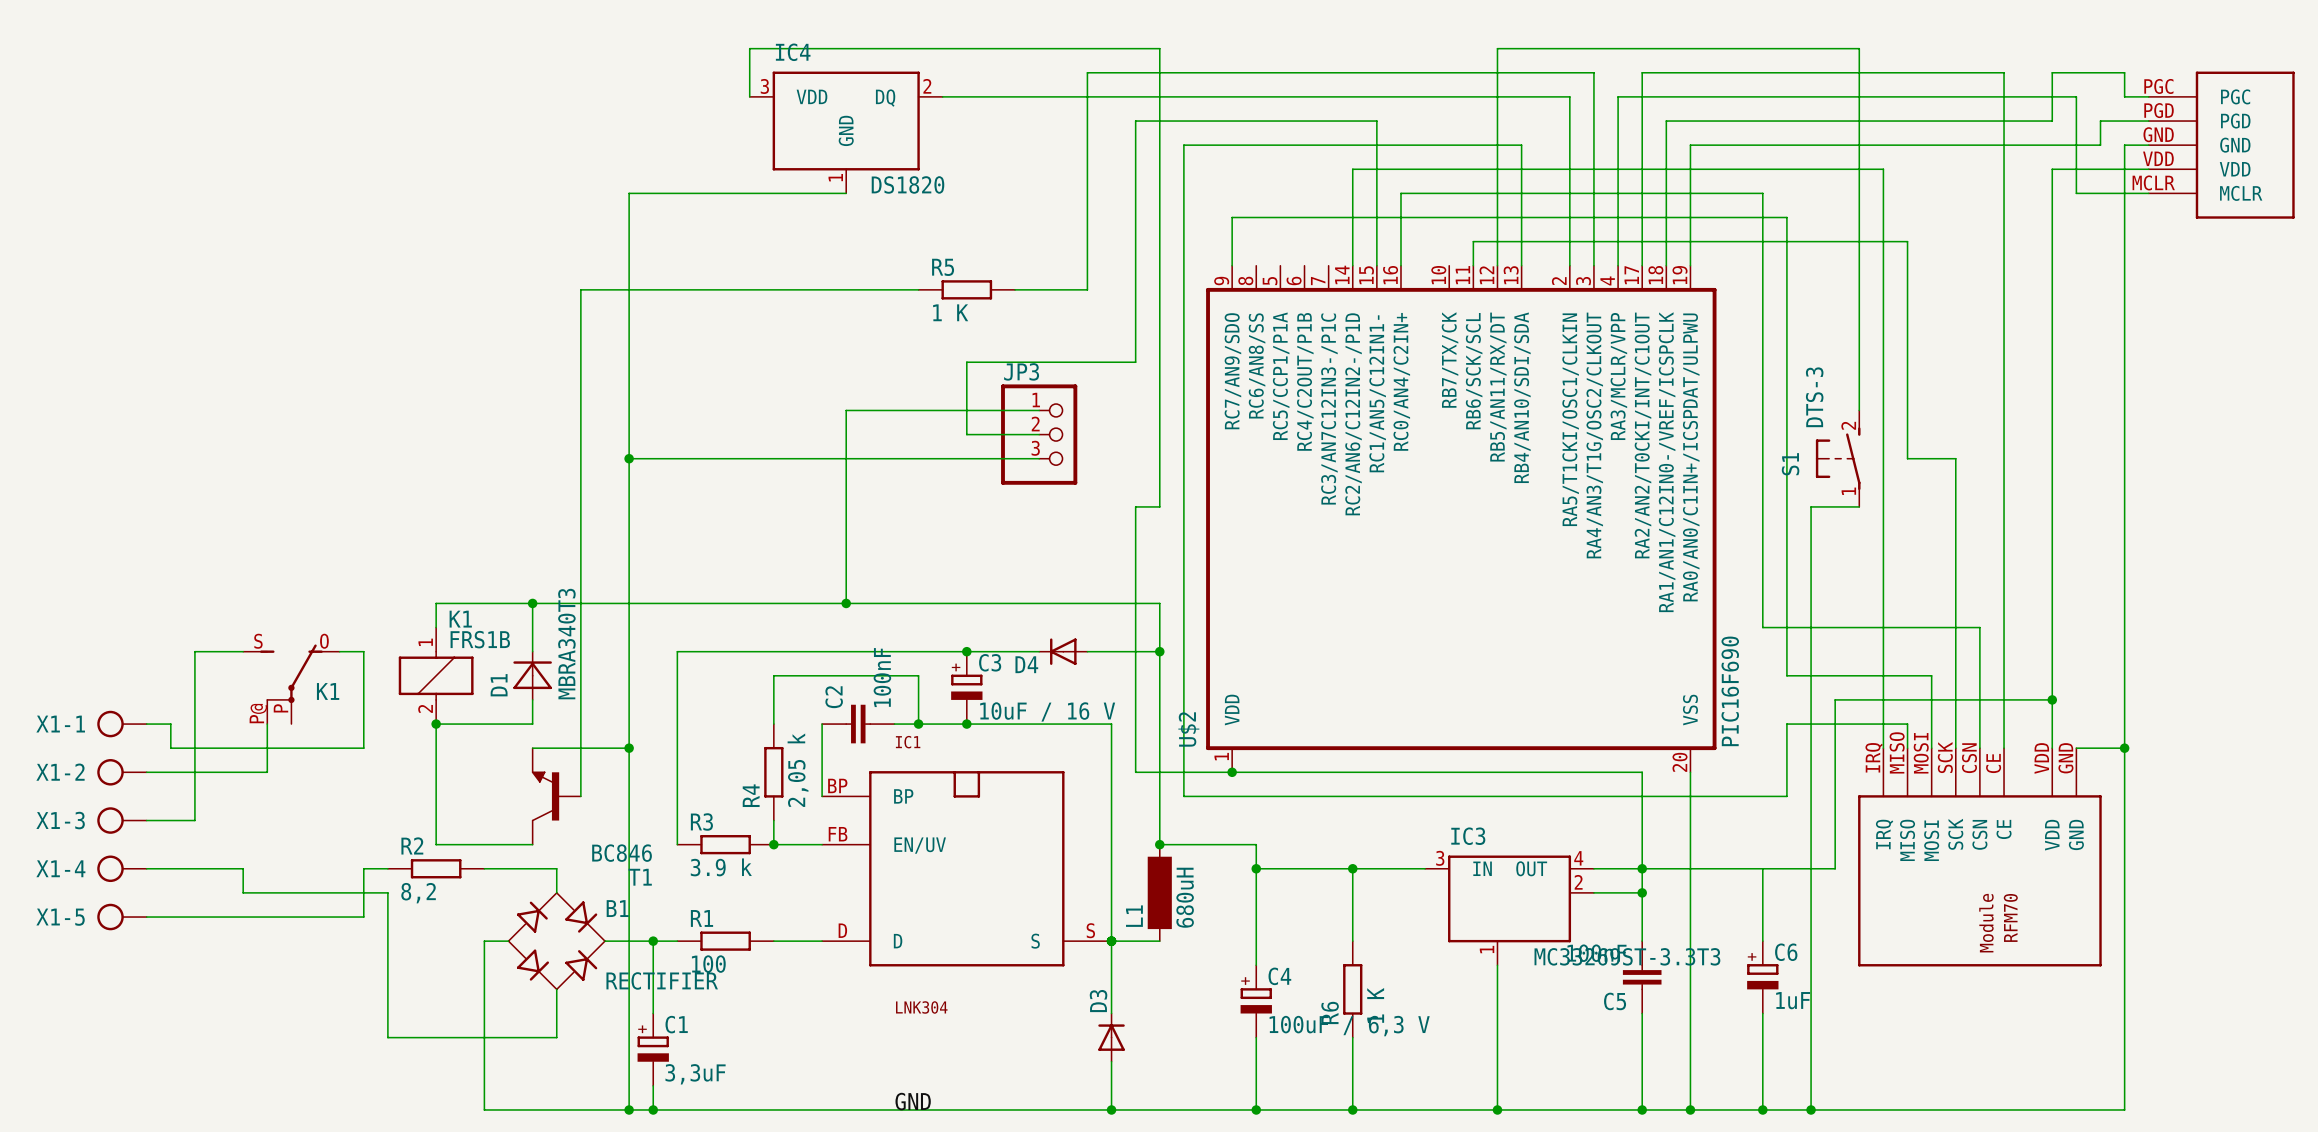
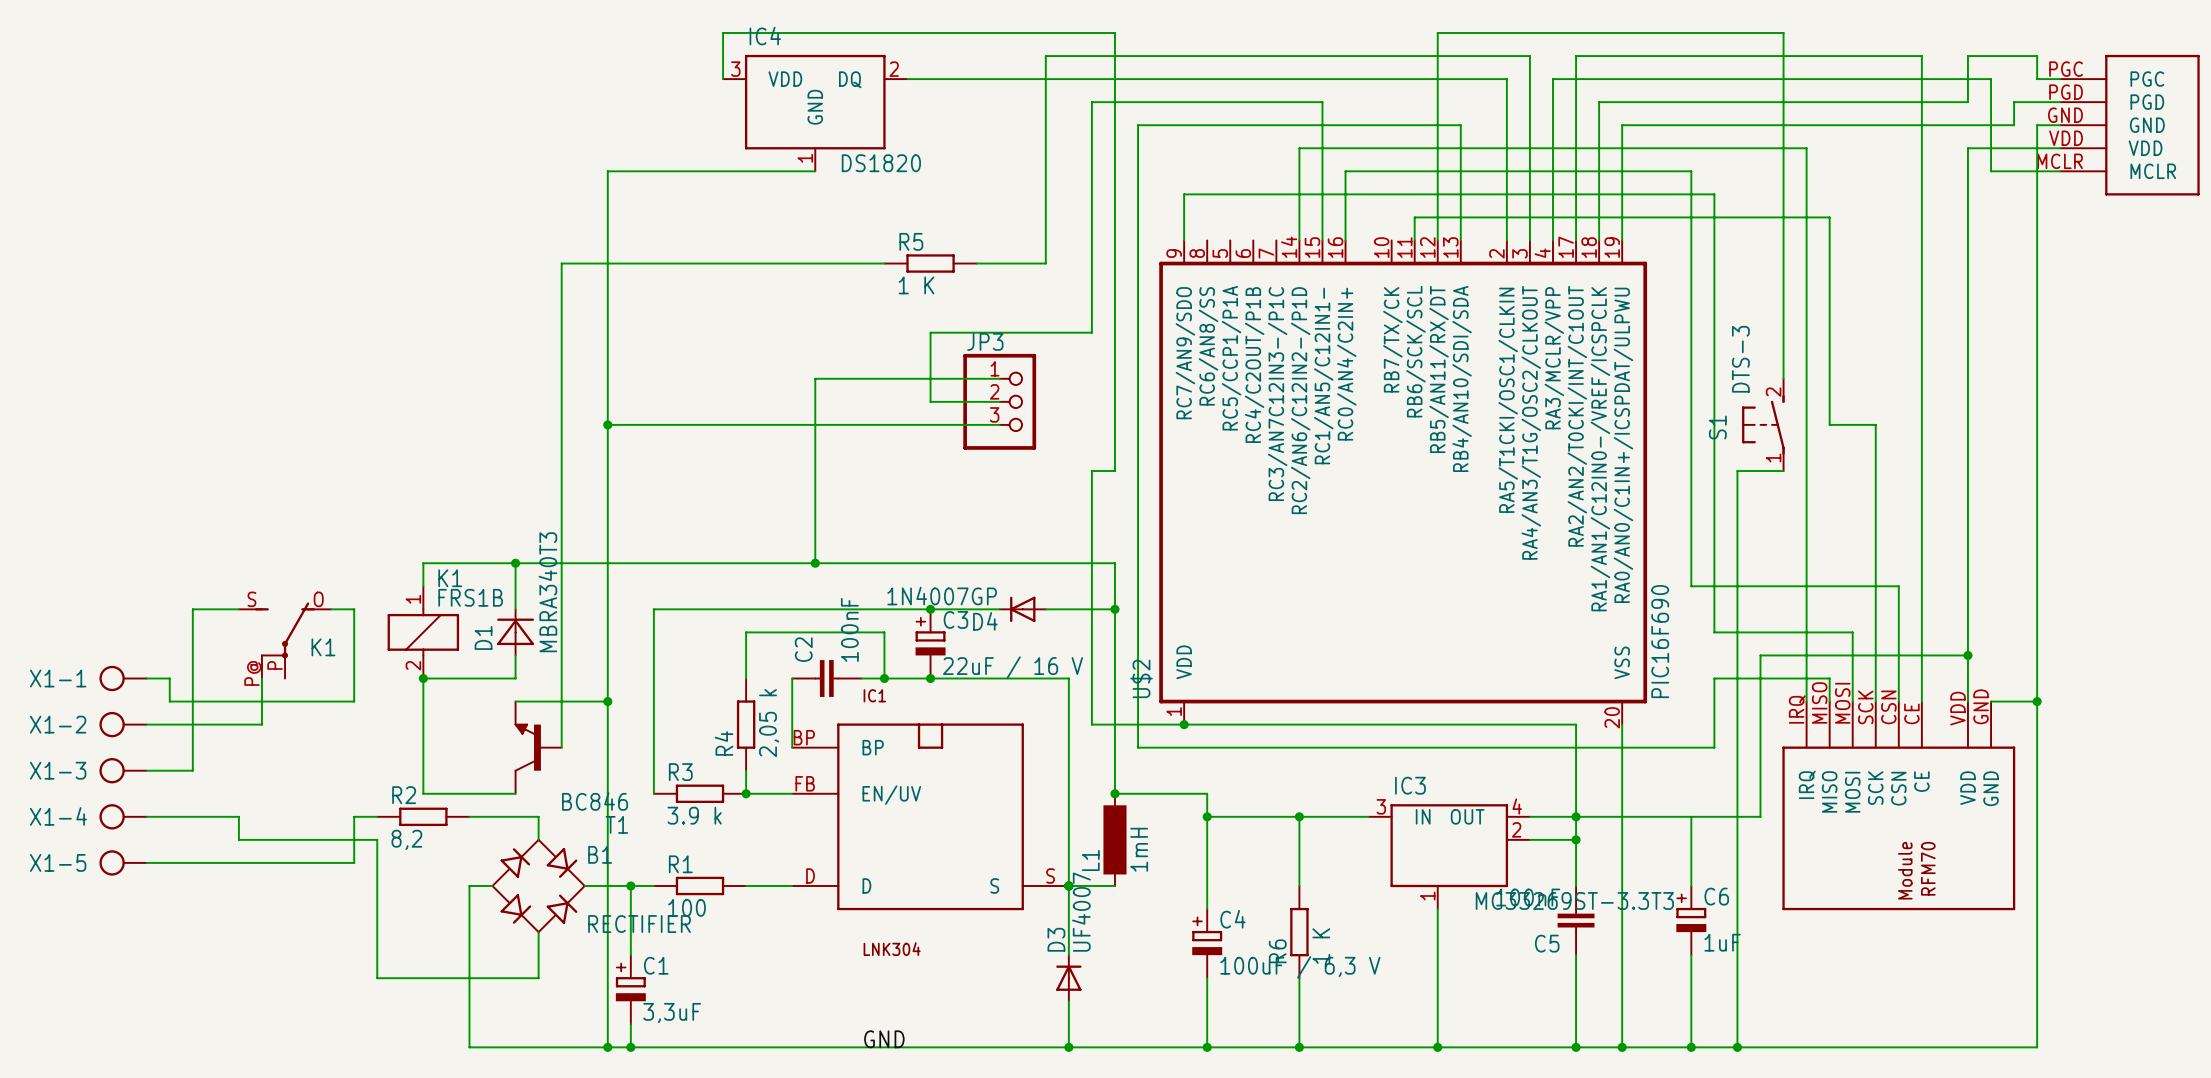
D4 value: none -> 1N4007GP (942, 596)
C3 value: 10uF / 16 V (1047, 711) -> 22uF / 16 V (1013, 667)
L1 value: 680uH (1185, 897) -> 1mH (1139, 849)
D3 value: none -> UF4007 (1081, 912)

